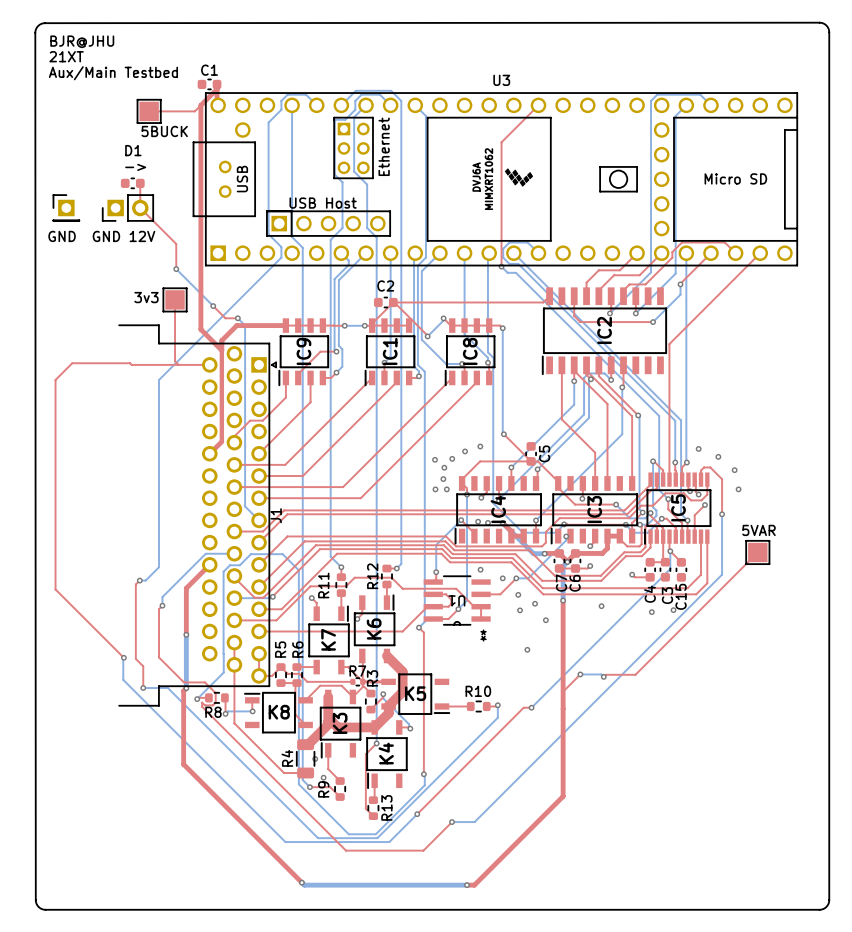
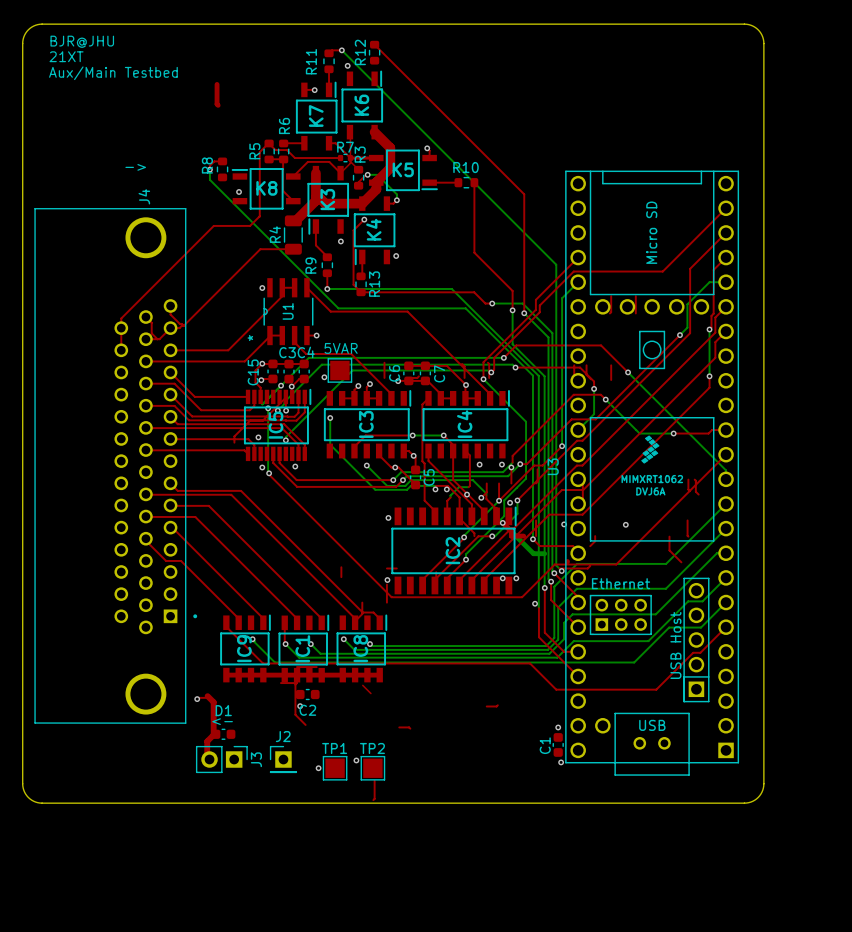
board edge: (819, 22) (45, 23) (38, 26) (35, 32) (35, 900) (38, 906) (45, 909) (819, 909) (827, 906) (829, 900) (829, 32) (826, 25) (819, 22) -> (42, 24) (28, 29) (22, 43) (22, 783) (28, 797) (42, 803) (744, 803) (758, 797) (763, 783) (763, 43) (758, 29) (744, 24) (42, 24)
top track: none -> (374, 44) (524, 194) (524, 313)
top track: none -> (341, 50) (331, 50) (329, 53)
bottom track: none -> (341, 50) (556, 264) (556, 565) (561, 571)
via: none -> (341, 50)
via: none -> (347, 65)
top track: none -> (329, 69) (329, 89)
C1 rotation: 0° (209, 84) -> 90° clockwise (558, 744)
C1 position: (209, 84) -> (558, 744)
top track: (217, 89) (200, 105) -> none
top track: none -> (304, 89) (314, 90)
via: none -> (314, 90)
top track: (200, 105) (194, 111) (149, 111) -> none
top track: (200, 105) (200, 329) (221, 350) -> none
bottom track: (292, 105) (292, 237) (302, 247) (302, 779) (309, 787) -> none
bottom track: (316, 105) (306, 94) (287, 94) (281, 100) (281, 109) (268, 122) (268, 234) (281, 247) (281, 257) (159, 380) (159, 567) (145, 580) (139, 580) -> none
bottom track: (341, 105) (355, 90) (391, 90) (401, 100) (401, 563) (396, 568) -> none
bottom track: (366, 105) (354, 117) (354, 171) (367, 184) (367, 228) (376, 237) (376, 743) -> none
bottom track: (390, 105) (379, 94) (361, 94) (355, 100) (355, 109) (345, 119) (334, 119) (334, 174) (342, 182) (342, 228) (330, 239) (330, 556) (341, 567) -> none
bottom track: (415, 105) (425, 116) (425, 257) (417, 265) (417, 364) (424, 371) (424, 621) (418, 627) -> none
top track: (538, 105) (501, 142) (501, 266) -> none
bottom track: (686, 105) (675, 116) (675, 273) (635, 313) -> none
bottom track: (710, 105) (700, 94) (657, 94) (651, 100) (651, 272) (609, 313) -> none
part: (149, 111) -> none
text: 5BUCK (164, 131) -> none
top track: none -> (374, 132) (390, 147) (390, 168) (376, 182)
top track: none -> (350, 138) (350, 163) (340, 173) (329, 161) (307, 161) (293, 176)
top track: none -> (284, 143) (304, 143)
top track: none -> (329, 143) (335, 143) (350, 158) (369, 158)
top track: none -> (427, 148) (429, 150) (429, 158)
via: none -> (427, 148)
text: D1 (133, 150) -> none
top track: none -> (340, 158) (294, 158) (286, 150) (275, 150) (268, 143) (259, 152) (259, 216)
top track: none -> (268, 159) (284, 159) (283, 190) (293, 201)
top track: none -> (222, 161) (214, 161) (209, 165) (209, 169)
top track: none -> (350, 161) (358, 169)
bottom track: none -> (209, 169) (209, 179) (338, 308) (465, 308) (532, 375) (532, 539)
via: none -> (209, 169)
top track: none -> (315, 173) (315, 200) (295, 220) (293, 220)
top track: none -> (367, 174) (358, 182) (358, 185)
bottom track: none -> (367, 174) (377, 174) (396, 194) (396, 200)
via: none -> (367, 174)
U3 rotation: 0° (495, 179) -> 90° counterclockwise (652, 473)
top track: none -> (376, 182) (376, 189) (362, 203) (325, 203) (319, 198) (315, 198)
top track: none -> (429, 182) (458, 182)
top track: none -> (474, 182) (474, 252) (512, 290) (512, 310)
part: (132, 183) -> none
top track: (140, 183) (140, 207) (176, 243) (176, 269) -> none
via: none -> (239, 191)
top track: none -> (396, 200) (393, 203) (386, 203)
via: none -> (396, 200)
part: (66, 207) -> none
part: (127, 207) -> none
top track: none -> (726, 208) (662, 271) (573, 271) (539, 305) (539, 312) (494, 357) (494, 369) (491, 372)
top track: none -> (259, 216) (250, 225) (213, 225) (121, 318) (121, 350)
top track: none -> (364, 219) (353, 230) (353, 284) (361, 292) (474, 292) (485, 303) (492, 303)
via: none -> (364, 219)
top track: none -> (315, 226) (315, 245) (327, 257)
top track: none -> (726, 232) (690, 268) (690, 333) (582, 440) (577, 440) (517, 500)
text: GND GND 12V (101, 236) -> none
via: none -> (340, 241)
top track: none -> (293, 249) (260, 249) (183, 325)
bottom track: (341, 253) (348, 260) (348, 264) (334, 279) (334, 349) (336, 351) -> none
bottom track: (366, 253) (338, 280) (338, 345) (342, 349) (342, 366) (336, 372) -> none
bottom track: (390, 253) (390, 356) (384, 362) -> none
bottom track: (415, 253) (414, 366) (418, 371) (418, 376) -> none
bottom track: (439, 253) (421, 271) (421, 339) (446, 363) (462, 363) -> none
bottom track: (464, 253) (464, 334) (487, 357) (487, 362) -> none
bottom track: (489, 253) (487, 352) (493, 358) (493, 503) (522, 532) (555, 532) (564, 524) -> none
bottom track: (513, 253) (681, 420) (681, 513) (687, 520) -> none
bottom track: (538, 253) (527, 242) (509, 242) (503, 248) (503, 257) (509, 263) (518, 263) (675, 420) (675, 462) -> none
top track: (637, 253) (619, 270) (598, 270) (586, 282) (586, 296) -> none
top track: (661, 253) (639, 275) (614, 275) (598, 290) (598, 296) -> none
bottom track: (686, 253) (686, 462) -> none
top track: (710, 253) (680, 284) -> none
top track: (735, 253) (724, 242) (681, 242) (672, 252) (672, 257) (645, 284) (629, 284) (623, 290) (623, 296) -> none
top track: (760, 253) (669, 344) (669, 479) -> none
top track: none -> (362, 256) (361, 276)
via: none -> (396, 256)
top track: none -> (578, 257) (535, 299) (535, 309) (483, 362) (483, 379)
top track: none -> (726, 257) (713, 269) (713, 313) (711, 315) (711, 327) (709, 329)
bottom track: (501, 266) (507, 272) (515, 272) (659, 416) (659, 490) (668, 499) -> none
via: (501, 266) -> none
bottom track: (176, 269) (213, 306) -> none
via: (176, 269) -> none
top track: none -> (327, 273) (327, 288)
bottom track: none -> (578, 282) (562, 298) (562, 446)
bottom track: none -> (726, 282) (709, 282) (687, 304) (687, 327) (679, 335)
bottom track: (680, 284) (680, 294) (653, 322) -> none
via: (680, 284) -> none
C2 name position: C2 (385, 285) -> C2 (307, 710)
top track: none -> (294, 287) (282, 287) (282, 296) (228, 350) (170, 350)
top track: none -> (306, 287) (330, 311) (407, 311) (490, 394) (490, 398)
via: none -> (262, 288)
bottom track: none -> (327, 288) (451, 288) (538, 375) (538, 608)
via: none -> (327, 288)
top track: (549, 296) (543, 302) (393, 302) (370, 325) -> none
top track: (574, 296) (574, 315) (580, 322) (653, 322) -> none
text: 3v3 (146, 297) -> none
top track: (175, 299) (175, 361) (178, 364) -> none
part: (175, 299) -> none
C2 position: (385, 302) -> (307, 694)
top track: (394, 302) (427, 336) -> none
bottom track: none -> (492, 303) (522, 303) (552, 333) (552, 571) (554, 573)
via: none -> (492, 303)
top track: none -> (170, 305) (170, 314) (183, 325)
top track: (213, 306) (225, 318) (237, 318) -> none
via: (213, 306) -> none
top track: none -> (726, 306) (715, 317) (715, 332) (582, 465) (576, 465) (514, 528) (511, 528) (459, 580) (459, 585)
bottom track: none -> (512, 310) (512, 344) (544, 376) (544, 587)
via: none -> (512, 310)
bottom track: none -> (524, 313) (548, 337) (548, 579) (551, 581)
via: none -> (524, 313)
via: (609, 313) -> none
via: (635, 313) -> none
top track: none -> (145, 317) (151, 322) (151, 333) (157, 339)
bottom track: (237, 318) (245, 325) (245, 506) (259, 520) -> none
via: (237, 318) -> none
top track: (443, 318) (450, 325) (500, 325) (502, 328) -> none
bottom track: (443, 318) (427, 336) -> none
via: (443, 318) -> none
via: (653, 322) -> none
top track: none -> (183, 325) (179, 328) (170, 328) (159, 339) (145, 339)
top track: (344, 325) (236, 325) (221, 340) (221, 350) -> none
bottom track: (344, 325) (364, 325) -> none
via: (344, 325) -> none
via: (364, 325) -> none
top track: (409, 325) (364, 325) -> none
bottom track: (502, 328) (503, 434) -> none
via: (502, 328) -> none
bottom track: none -> (709, 329) (709, 376)
via: none -> (709, 329)
IC2 rotation: 0° (604, 331) -> 180° (453, 550)
IC2 position: (604, 331) -> (453, 550)
top track: none -> (726, 331) (715, 342) (715, 357) (583, 490) (561, 490) (471, 580) (471, 585)
top track: none -> (282, 335) (269, 335) (244, 361) (145, 361)
top track: none -> (294, 335) (294, 342) (306, 353) (351, 353) (391, 394) (391, 398)
top track: none -> (306, 335) (316, 335)
via: none -> (316, 335)
top track: none -> (679, 335) (595, 419) (571, 419) (526, 464) (520, 464)
via: none -> (679, 335)
via: (427, 336) -> none
text: none -> 5VAR (341, 348)
top track: (221, 350) (221, 441) (209, 453) -> none
top track: (336, 351) (320, 351) (298, 374) (298, 377) -> none
via: (336, 351) -> none
IC9 rotation: 0° (303, 352) -> 180° (245, 648)
IC9 position: (303, 352) -> (245, 648)
IC1 rotation: 0° (390, 352) -> 180° (303, 648)
IC1 position: (390, 352) -> (303, 648)
IC8 rotation: 0° (470, 352) -> 180° (361, 648)
IC8 position: (470, 352) -> (361, 648)
top track: none -> (503, 357) (516, 345) (601, 345) (628, 372)
bottom track: none -> (503, 357) (308, 357) (262, 404)
via: none -> (503, 357)
via: (384, 362) -> none
via: (487, 362) -> none
via: none -> (262, 363)
top track: none -> (304, 363) (262, 363) (255, 370) (255, 382) (260, 387) (260, 396)
via: (462, 363) -> none
top track: (209, 364) (72, 363) (55, 379) (55, 589) (123, 657) -> none
top track: none -> (408, 365) (446, 365) (466, 385) (465, 398) (477, 398)
top track: (561, 365) (561, 419) (595, 452) (595, 483) -> none
top track: (598, 365) (598, 376) (638, 415) -> none
top track: (623, 365) (622, 387) -> none
top track: none -> (515, 367) (580, 367) (594, 381) (594, 388)
bottom track: none -> (515, 367) (512, 364) (321, 364) (277, 410)
via: none -> (515, 367)
part: none -> (339, 370)
top track: (574, 370) (607, 404) (607, 483) -> none
top track: (586, 370) (632, 416) (632, 483) -> none
top track: none -> (170, 372) (194, 396) (248, 396)
top track: (336, 372) (331, 377) (322, 377) -> none
via: (336, 372) -> none
bottom track: none -> (491, 372) (489, 370) (352, 370) (285, 437) (285, 440)
via: none -> (491, 372)
bottom track: none -> (628, 372) (726, 470) (726, 479)
via: none -> (628, 372)
via: (418, 376) -> none
top track: none -> (709, 376) (709, 387) (582, 514) (549, 514) (484, 579) (484, 585)
via: none -> (709, 376)
top track: (310, 377) (310, 402) (259, 453) -> none
via: none -> (324, 377)
top track: (372, 377) (285, 464) (234, 464) -> none
top track: (396, 377) (396, 382) (302, 475) (259, 475) -> none
top track: (452, 377) (343, 487) (234, 487) -> none
top track: (476, 377) (476, 382) (360, 498) (259, 498) -> none
top track: none -> (272, 378) (261, 380)
top track: none -> (304, 379) (299, 379) (291, 386)
bottom track: none -> (483, 379) (526, 421) (526, 478) (504, 500) (504, 516) (466, 554) (466, 559)
via: none -> (483, 379)
bottom track: (590, 379) (589, 381) (589, 417) (537, 469) -> none
via: (590, 379) -> none
bottom track: (611, 379) (604, 373) (588, 373) (584, 377) (584, 414) (499, 500) -> none
via: (611, 379) -> none
via: none -> (261, 380)
top track: none -> (398, 381) (427, 380) (440, 394) (440, 398) (453, 398)
via: none -> (398, 381)
bottom track: (574, 381) (574, 404) (511, 467) -> none
via: (574, 381) -> none
top track: none -> (145, 383) (174, 383) (201, 410) (249, 410) (254, 405) (254, 396)
top track: none -> (370, 384) (366, 387) (366, 398) (379, 398)
via: none -> (370, 384)
via: none -> (281, 385)
via: none -> (466, 385)
via: none -> (291, 386)
top track: none -> (358, 386) (354, 389) (354, 398) (342, 398)
via: none -> (358, 386)
bottom track: (622, 387) (622, 434) (536, 520) -> none
via: (622, 387) -> none
bottom track: none -> (594, 388) (594, 414) (578, 430)
via: none -> (594, 388)
top track: none -> (170, 394) (192, 416) (294, 416) (298, 412) (298, 396)
top track: none -> (304, 396) (304, 412) (296, 420) (188, 420) (174, 405) (145, 405)
top track: none -> (428, 398) (422, 404) (422, 461) (424, 463) (424, 500) (434, 510) (434, 516)
top track: none -> (605, 399) (600, 394) (573, 394) (512, 455) (512, 462)
bottom track: none -> (605, 399) (639, 433) (673, 433)
via: none -> (605, 399)
bottom track: none -> (268, 408) (269, 473)
via: none -> (268, 408)
via: none -> (277, 410)
via: none -> (286, 410)
bottom track: (638, 415) (639, 509) (642, 512) -> none
via: (638, 415) -> none
top track: none -> (170, 417) (177, 424) (284, 424) (304, 444) (304, 453)
bottom track: none -> (330, 418) (330, 444) (375, 489) (407, 489) (410, 485) (435, 485)
via: none -> (330, 418)
top track: none -> (145, 428) (281, 428) (298, 444) (298, 453)
top track: none -> (726, 430) (712, 430) (708, 433) (673, 433)
via: none -> (673, 433)
top track: (503, 434) (531, 461) -> none
via: (503, 434) -> none
top track: none -> (412, 435) (365, 435) (354, 446) (354, 451)
bottom track: none -> (412, 435) (443, 435)
via: none -> (412, 435)
top track: none -> (443, 435) (453, 444) (453, 479) (484, 510) (484, 516)
via: none -> (443, 435)
via: none -> (258, 437)
top track: none -> (170, 439) (248, 439) (254, 445) (254, 453)
via: none -> (285, 440)
via: (480, 446) -> none
top track: none -> (562, 446) (542, 465) (534, 465) (497, 502)
via: none -> (562, 446)
via: (698, 448) -> none
top track: none -> (145, 450) (244, 450) (248, 453)
top track: none -> (379, 451) (379, 455) (391, 467) (398, 467) (415, 484)
top track: none -> (403, 451) (408, 451) (415, 457) (415, 469)
top track: none -> (428, 451) (428, 460) (471, 504) (471, 516)
top track: none -> (465, 451) (469, 455) (468, 487)
via: (465, 451) -> none
top track: none -> (273, 453) (273, 463) (297, 486) (396, 486) (402, 480)
top track: none -> (279, 453) (279, 463) (296, 480) (393, 480)
C5 position: (531, 453) -> (415, 477)
top track: none -> (726, 454) (616, 564) (554, 564) (522, 597) (391, 597) (269, 473)
via: none -> (413, 455)
via: (718, 456) -> none
via: (452, 458) -> none
via: (435, 459) -> none
top track: (653, 461) (663, 470) (663, 479) -> none
bottom track: (653, 461) (653, 507) (656, 510) (656, 515) (647, 524) (639, 524) -> none
via: (653, 461) -> none
bottom track: none -> (512, 462) (503, 472) (401, 472) (393, 480)
top track: (675, 462) (675, 479) -> none
via: (675, 462) -> none
top track: (686, 462) (682, 467) (682, 479) -> none
via: (686, 462) -> none
via: none -> (479, 464)
via: none -> (501, 464)
bottom track: none -> (520, 464) (508, 476) (406, 476) (402, 480)
via: none -> (520, 464)
J4: none -> (115, 465)
bottom track: none -> (366, 465) (387, 485) (405, 485) (411, 480) (472, 480) (486, 495)
via: none -> (366, 465)
via: none -> (295, 466)
via: none -> (262, 467)
via: none -> (395, 467)
via: (444, 467) -> none
via: (537, 469) -> none
via: (734, 470) -> none
via: none -> (269, 473)
via: (443, 479) -> none
top track: (650, 479) (650, 484) (624, 510) (284, 510) (263, 531) (234, 531) -> none
top track: (656, 479) (656, 488) (651, 489) (627, 514) (287, 514) (259, 542) -> none
top track: (701, 479) (701, 470) (704, 467) (710, 467) (722, 479) (722, 514) -> none
top track: (707, 479) (707, 494) (701, 500) (690, 500) (683, 493) (665, 493) (653, 505) (641, 505) (628, 518) (559, 518) (545, 532) (545, 542) (542, 546) (456, 546) (446, 536) (287, 536) (259, 564) -> none
via: none -> (393, 480)
via: none -> (402, 480)
top track: none -> (170, 483) (177, 490) (241, 490) (362, 612) (373, 612) (379, 618) (379, 622)
top track: none -> (435, 485) (447, 485) (459, 497) (459, 516)
bottom track: none -> (468, 487) (459, 487) (450, 497)
via: (738, 489) -> none
via: (690, 491) -> none
top track: none -> (145, 494) (231, 494) (355, 618) (355, 622)
top track: (467, 494) (467, 488) (462, 483) (462, 479) (480, 461) (537, 461) (558, 481) (558, 487) (575, 504) (616, 504) -> none
bottom track: (467, 494) (467, 600) (458, 609) -> none
via: (698, 494) -> none
top track: none -> (486, 495) (486, 499) (496, 507) (496, 516)
top track: none -> (450, 497) (447, 500) (447, 516)
via: (582, 498) -> none
top track: (668, 499) (668, 509) (682, 523) (682, 536) -> none
via: (668, 499) -> none
bottom track: none -> (517, 500) (517, 513) (495, 536) (492, 536)
via: none -> (517, 500)
bottom track: none -> (497, 502) (464, 537)
via: none -> (510, 502)
bottom track: none -> (726, 503) (666, 563) (577, 563) (554, 586) (554, 637) (546, 646) (371, 646) (370, 644)
bottom track: (616, 504) (629, 518) (645, 518) (650, 513) -> none
via: (616, 504) -> none
top track: none -> (170, 505) (208, 505) (321, 618) (321, 622)
top track: (704, 505) (694, 515) (694, 536) -> none
via: (704, 505) -> none
IC5 rotation: 0° (677, 508) -> 180° (277, 424)
IC5 position: (677, 508) -> (277, 424)
IC4 rotation: 0° (498, 510) -> 180° (466, 424)
IC4 position: (498, 510) -> (466, 424)
IC3 rotation: 0° (594, 510) -> 180° (367, 424)
IC3 position: (594, 510) -> (367, 424)
top track: (642, 512) (632, 523) (632, 536) -> none
via: (642, 512) -> none
top track: (650, 513) (650, 515) (663, 528) (663, 560) (665, 562) (650, 562) -> none
via: (650, 513) -> none
bottom track: (722, 514) (722, 574) (669, 627) -> (726, 602) (701, 627) (669, 627)
via: (722, 514) -> none
J1: (197, 515) -> none
top track: none -> (145, 516) (195, 516) (297, 618) (297, 622)
via: none -> (388, 517)
top track: (661, 518) (666, 518) (675, 527) (675, 536) -> none
bottom track: (661, 518) (647, 532) (633, 532) (625, 524) -> none
via: (661, 518) -> none
bottom track: (461, 520) (436, 545) (436, 572) -> none
via: (461, 520) -> none
via: (536, 520) -> none
via: (687, 520) -> none
via: (478, 521) -> none
via: (487, 522) -> none
top track: (564, 524) (625, 524) -> none
top track: (639, 524) (641, 544) (639, 546) (627, 546) (619, 538) (619, 536) (607, 536) (607, 548) (602, 553) (575, 553) (567, 561) (559, 553) (544, 553) -> none
via: (639, 524) -> none
top track: none -> (170, 528) (172, 528) (263, 618) (263, 622)
bottom track: none -> (726, 528) (665, 588) (576, 588) (558, 607) (558, 639) (547, 649) (354, 649) (343, 639)
text: 5VAR (758, 530) -> none
top track: none -> (492, 536) (478, 536) (434, 579) (434, 585)
via: none -> (492, 536)
bottom track: (566, 536) (566, 540) (528, 578) (516, 578) -> none
via: (566, 536) -> none
top track: (650, 536) (650, 547) (641, 556) (625, 556) (601, 580) (542, 580) (515, 554) (452, 554) (443, 545) (315, 545) (263, 597) (254, 597) (234, 575) -> none
top track: (656, 536) (656, 527) (654, 525) (646, 525) (645, 547) (640, 552) (624, 552) (600, 575) (554, 575) (529, 550) (454, 550) (445, 541) (304, 541) (259, 587) -> none
top track: (701, 536) (701, 574) (687, 588) (542, 588) (512, 558) (451, 558) (442, 549) (320, 549) (272, 596) -> none
top track: (707, 536) (707, 583) (696, 594) (543, 594) (511, 562) (450, 562) (441, 553) (337, 553) (281, 609) (259, 609) -> none
top track: none -> (464, 537) (422, 579) (422, 585)
via: none -> (464, 537)
top track: none -> (145, 539) (166, 560) (181, 560) (238, 618) (238, 622)
top track: none -> (532, 539) (539, 546) (572, 546) (578, 553)
via: none -> (532, 539)
via: (590, 546) -> none
bottom track: (670, 551) (670, 568) (531, 707) -> none
via: (670, 551) -> none
top track: (757, 552) (635, 674) (605, 674) (603, 676) -> none
part: (757, 552) -> none
bottom track: (234, 553) (205, 553) (162, 597) (162, 605) -> none
via: (544, 553) -> none
bottom track: none -> (726, 553) (716, 553) (655, 614) (572, 614) (564, 622) (564, 639) (549, 653) (320, 653) (310, 644)
top track: none -> (466, 559) (447, 578) (447, 585)
via: none -> (466, 559)
C7 position: (559, 560) -> (425, 373)
C6 position: (575, 560) -> (408, 373)
bottom track: (567, 562) (563, 566) (563, 600) -> none
via: (567, 562) -> none
top track: (209, 564) (186, 588) (186, 634) -> none
via: (590, 566) -> none
via: (341, 567) -> none
via position: (396, 568) -> (387, 580)
via: (480, 569) -> none
C4 position: (650, 569) -> (304, 371)
C3 position: (665, 569) -> (289, 371)
C15 position: (681, 569) -> (272, 371)
via: none -> (561, 571)
via: (436, 572) -> none
top track: none -> (554, 573) (578, 597) (578, 602)
via: none -> (554, 573)
top track: (632, 574) (634, 577) (650, 577) -> none
via: (632, 574) -> none
R12 position: (386, 576) -> (374, 52)
bottom track: none -> (726, 577) (702, 601) (688, 601) (648, 641) (573, 641) (557, 657) (299, 657) (285, 644)
top track: (516, 578) (500, 594) (481, 594) -> none
top track: (139, 580) (135, 584) (135, 658) (143, 666) (143, 688) -> none
via: (139, 580) -> none
top track: none -> (551, 581) (551, 600) (578, 627)
via: none -> (551, 581)
C7 name position: C7 (561, 583) -> C7 (439, 373)
C6 name position: C6 (575, 583) -> C6 (394, 373)
R11 position: (341, 585) -> (329, 61)
top track: none -> (544, 587) (544, 632) (564, 651) (578, 651)
via: none -> (544, 587)
top track: (341, 593) (341, 613) -> none
top track: (433, 594) (446, 594) (451, 599) (451, 603) (448, 606) (427, 606) (402, 631) (259, 631) -> none
via: (518, 594) -> none
C4 name rotation: 0° (650, 594) -> 90° clockwise (306, 352)
C4 name position: C4 (650, 594) -> C4 (306, 352)
C3 name rotation: 0° (667, 595) -> 90° clockwise (287, 352)
C3 name position: C3 (667, 595) -> C3 (287, 352)
bottom track: (272, 596) (234, 598) -> none
via: (272, 596) -> none
C15 name position: C15 (681, 596) -> C15 (253, 372)
top track: (311, 598) (316, 602) (316, 613) -> none
via: (311, 598) -> none
U1 rotation: 0° (457, 600) -> 90° clockwise (288, 311)
U1 position: (457, 600) -> (288, 311)
top track: (563, 600) (563, 796) (474, 885) (467, 885) -> none
via: (563, 600) -> none
top track: (162, 605) (159, 609) (159, 657) (183, 682) (205, 682) (215, 693) (215, 702) (212, 705) (204, 705) (202, 702) (202, 706) (346, 850) (423, 850) (452, 822) -> none
via: (162, 605) -> none
via: (601, 606) -> none
top track: none -> (538, 608) (538, 637) (578, 676)
top track: (458, 609) (448, 619) (433, 619) -> none
via: (458, 609) -> none
via: (520, 610) -> none
via: (673, 610) -> none
via: (651, 612) -> none
via: (357, 619) -> none
top track: (481, 619) (481, 606) (474, 606) (456, 588) (402, 588) (391, 577) (354, 577) (346, 586) (310, 586) (276, 620) (234, 620) -> none
via: (545, 620) -> none
top track: none -> (226, 622) (226, 626) (262, 663) (530, 663) (556, 689) (656, 689) (693, 652) (700, 652) (726, 627)
top track: none -> (284, 622) (285, 644)
top track: (418, 627) (423, 632) (423, 774) -> none
via: (418, 627) -> none
K6 position: (374, 628) -> (362, 104)
bottom track: (186, 634) (186, 688) -> none
via: (186, 634) -> none
via: none -> (252, 639)
K7 position: (329, 639) -> (316, 116)
via: none -> (343, 639)
top track: (234, 642) (234, 723) (284, 773) (305, 773) -> none
via: none -> (285, 644)
via: none -> (310, 644)
via: none -> (370, 644)
R5 name position: R5 (280, 649) -> R5 (254, 151)
via: (527, 649) -> none
top track: (259, 653) (259, 675) (272, 675) (280, 667) (287, 673) (299, 673) (307, 681) (352, 681) -> none
top track: (386, 655) (402, 671) (402, 691) (388, 706) -> none
bottom track: (123, 657) (123, 679) (285, 842) (389, 842) (417, 814) -> none
via: (123, 657) -> none
top track: (362, 662) (362, 687) (352, 696) (341, 685) (320, 685) (305, 700) -> none
bottom track: (634, 662) (474, 822) (452, 822) -> (634, 662) (274, 662) (252, 639)
top track: (341, 667) (347, 667) (362, 681) (382, 681) -> none
top track: (580, 674) (563, 691) (563, 708) -> none
bottom track: (580, 674) (601, 674) (603, 676) -> none
via: (580, 674) -> none
top track: none -> (226, 675) (379, 675)
R5 position: (280, 675) -> (269, 151)
R6 position: (297, 675) -> (283, 151)
via: (603, 676) -> none
R7 position: (357, 681) -> (345, 158)
bottom track: (143, 688) (167, 688) (318, 838) (377, 838) (497, 717) (497, 705) -> none
via: (143, 688) -> none
top track: (186, 688) (183, 690) (183, 764) (301, 882) -> none
via: (186, 688) -> none
top track: (383, 694) (383, 697) (370, 709) -> none
bottom track: (383, 694) (383, 698) (409, 724) (410, 728) -> none
via: (383, 694) -> none
K5 position: (415, 694) -> (403, 170)
top track: none -> (207, 696) (213, 702) (213, 734) (207, 741) (207, 760)
top track: (328, 696) (328, 724) (308, 744) (305, 744) -> none
R8 rotation: 0° (216, 697) -> 90° clockwise (222, 169)
R8 position: (216, 697) -> (222, 169)
top track: (224, 697) (225, 713) -> none
bottom track: (197, 699) (223, 672) (223, 571) (230, 565) (239, 565) (250, 554) (282, 554) (298, 570) (298, 784) (348, 834) (375, 834) (424, 785) (423, 774) -> none
top track: (252, 700) (252, 711) -> none
R3 position: (370, 701) -> (358, 177)
via: (497, 705) -> none
via: none -> (300, 706)
top track: (388, 706) (388, 713) (374, 727) (337, 727) (332, 722) (328, 722) -> none
top track: (441, 706) (470, 706) -> none
R10 position: (478, 706) -> (466, 182)
top track: (531, 707) (523, 707) (417, 814) -> none
via: (531, 707) -> none
bottom track: (252, 711) (228, 711) (225, 713) -> none
via: (252, 711) -> none
K8 position: (278, 712) -> (266, 188)
via: (225, 713) -> none
text: none -> <- (222, 721)
K3 position: (340, 724) -> (328, 200)
via: none -> (558, 727)
via: (410, 728) -> none
D1: none -> (223, 734)
top track: (376, 743) (365, 754) (365, 808) (373, 816) -> none
via: (376, 743) -> none
top track: (328, 750) (328, 769) (340, 781) -> none
K4 position: (386, 754) -> (374, 230)
R4 position: (305, 758) -> (293, 235)
via: (315, 758) -> none
J3: none -> (221, 759)
J2: none -> (283, 759)
via: none -> (356, 760)
via: none -> (561, 762)
via: none -> (318, 768)
TP1: none -> (335, 768)
TP2: none -> (372, 768)
via: (423, 774) -> none
via: (323, 777) -> none
top track: (309, 787) (330, 787) (340, 797) -> none
via: (309, 787) -> none
R9 position: (340, 789) -> (327, 265)
R13 position: (373, 808) -> (361, 284)
via: (417, 814) -> none
via: (452, 822) -> none
bottom track: (301, 882) (304, 885) (467, 885) -> none
via: (301, 882) -> none
via: (467, 885) -> none

